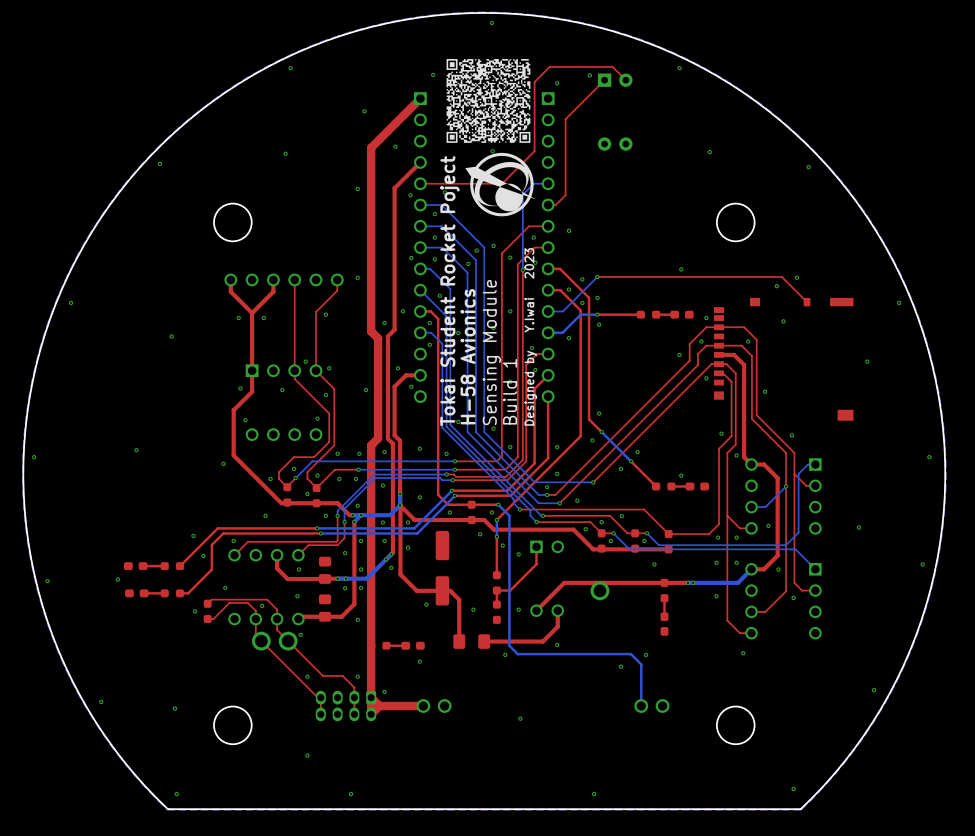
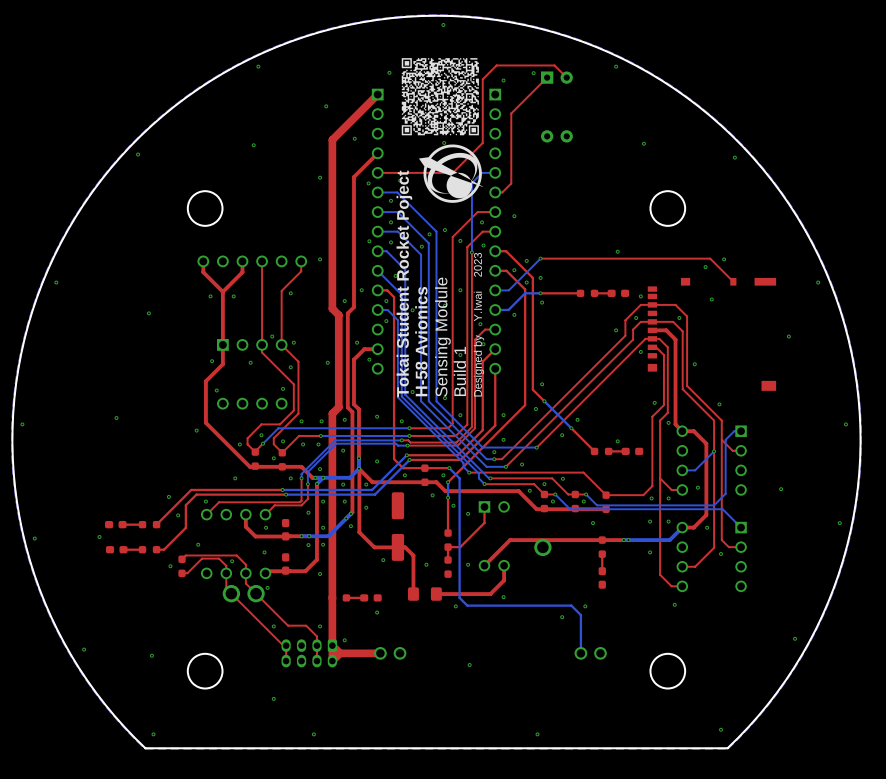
part footprint: [318, 556, 332, 584] -> [282, 518, 290, 541]
part footprint: [318, 594, 332, 622] -> [282, 553, 290, 575]

